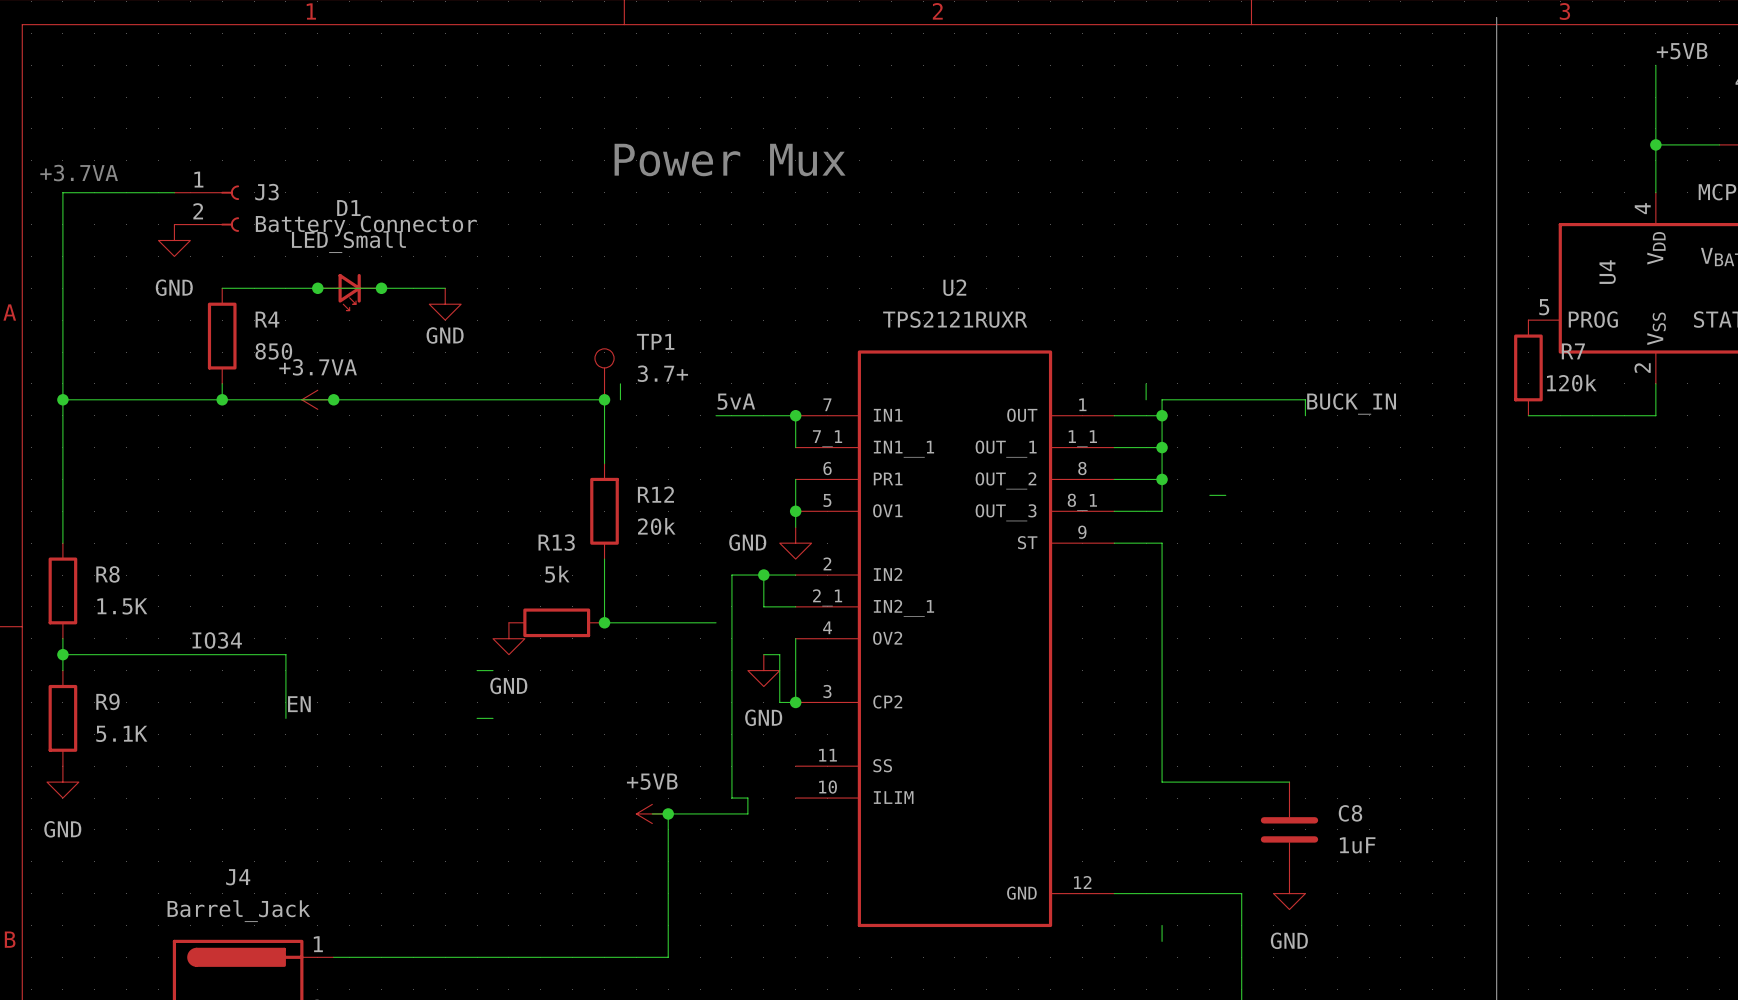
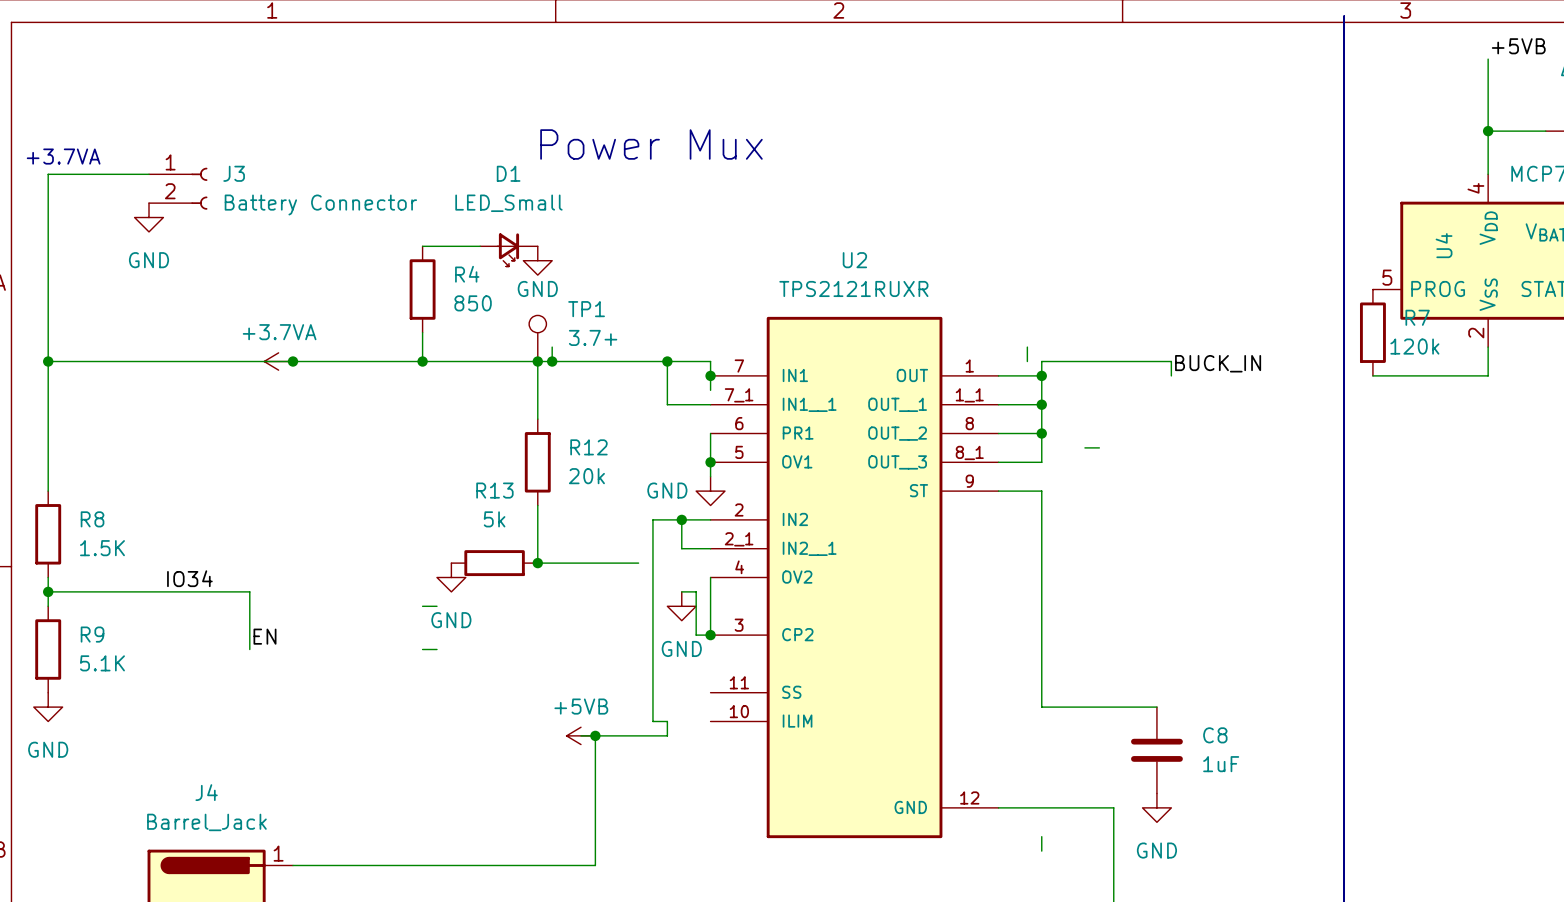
wire: none -> (422, 246) (480, 246)
wire: (222, 288) (445, 288) -> none
junction: (317, 288) -> none
junction: (381, 288) -> none
D1 position: (349, 292) -> (508, 249)
power symbol position: GND (445, 304) -> GND (537, 260)
R4 position: (222, 336) -> (422, 289)
wire: none -> (422, 332) (422, 361)
wire: (222, 383) (222, 399) -> none
junction: (222, 399) -> none
junction: none -> (422, 361)
junction: none -> (552, 361)
junction: none -> (667, 361)
label: 5vA (736, 401) -> none
wire: (716, 415) (795, 415) -> (537, 361) (710, 361) (710, 375)
wire: (795, 431) (795, 447) -> (667, 361) (667, 404) (710, 404)

